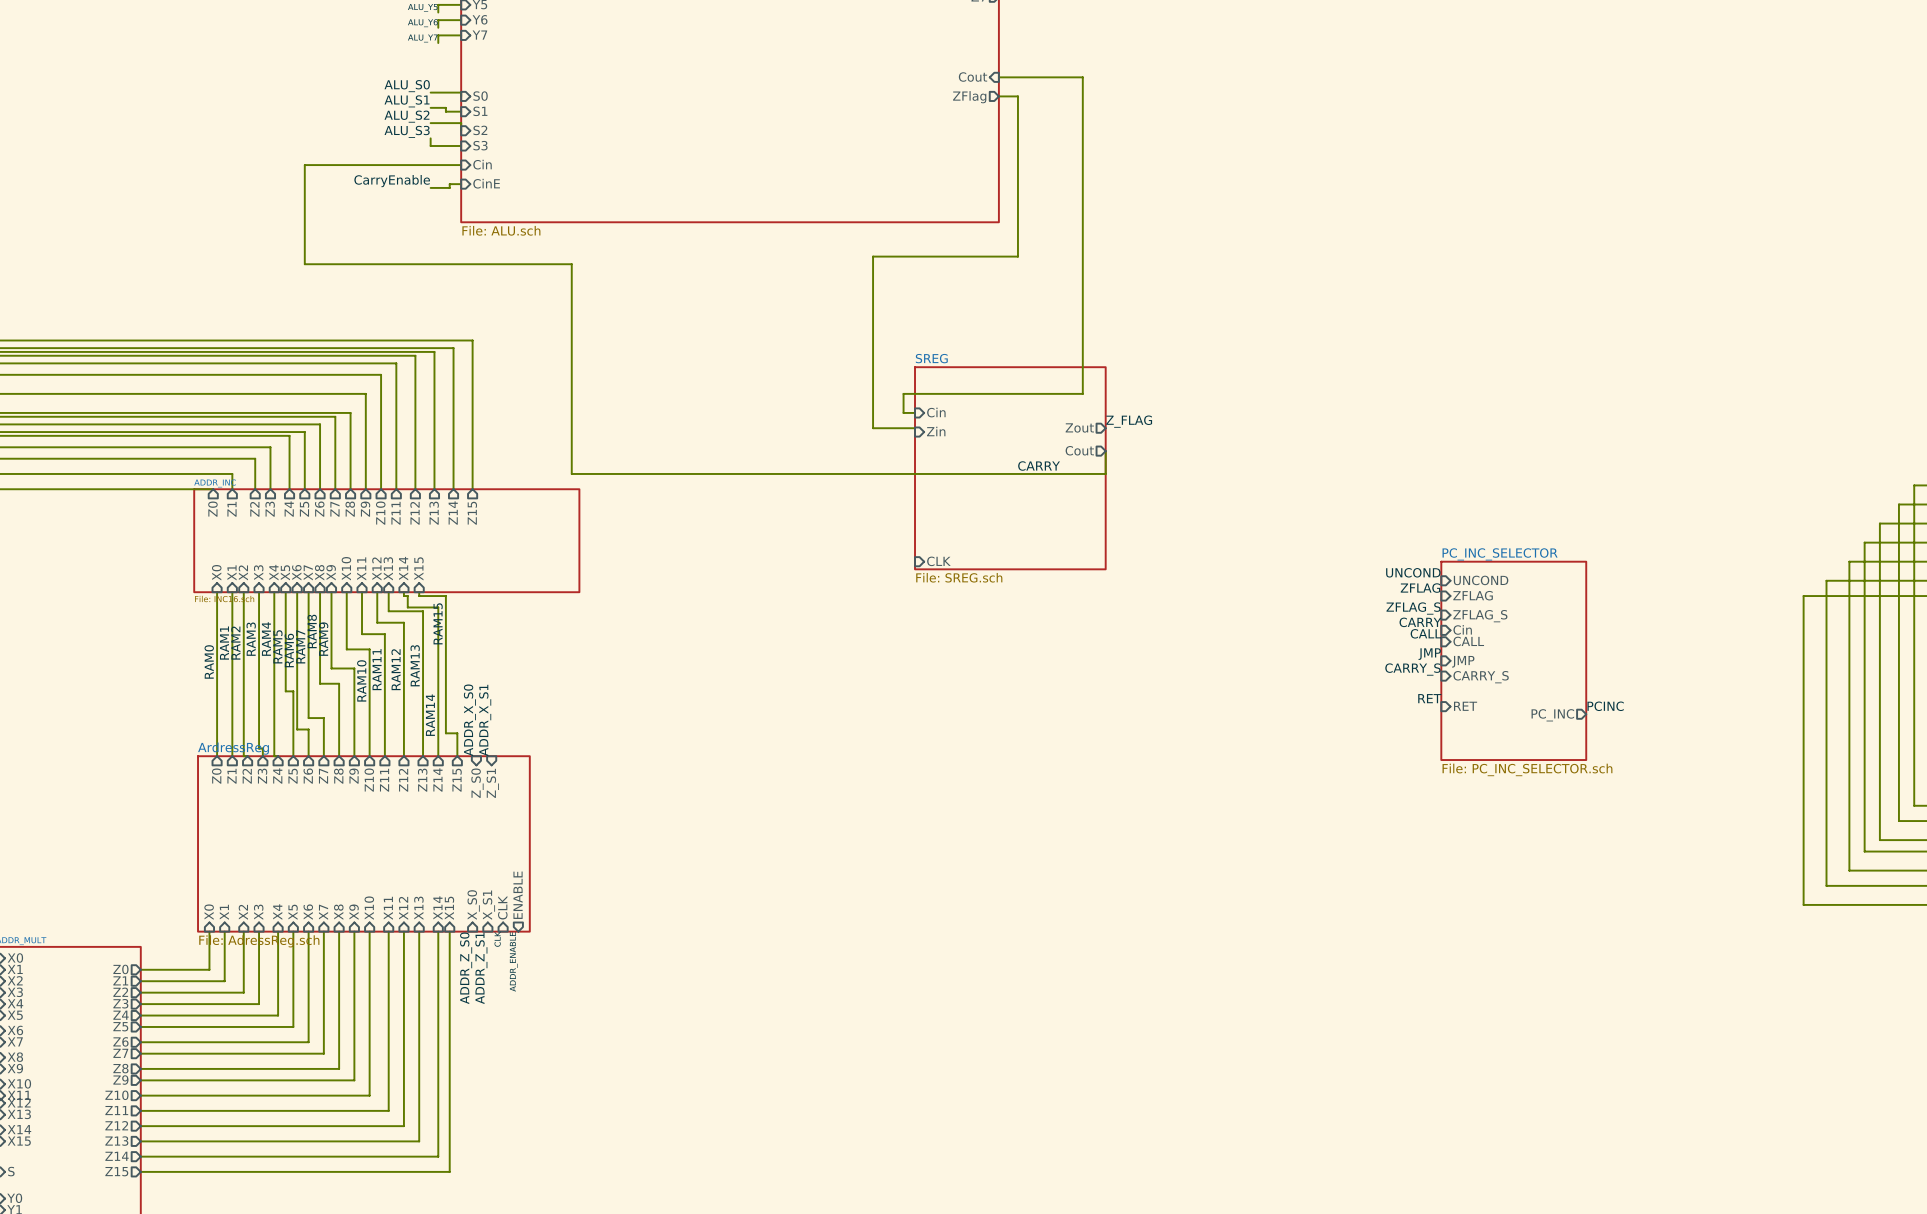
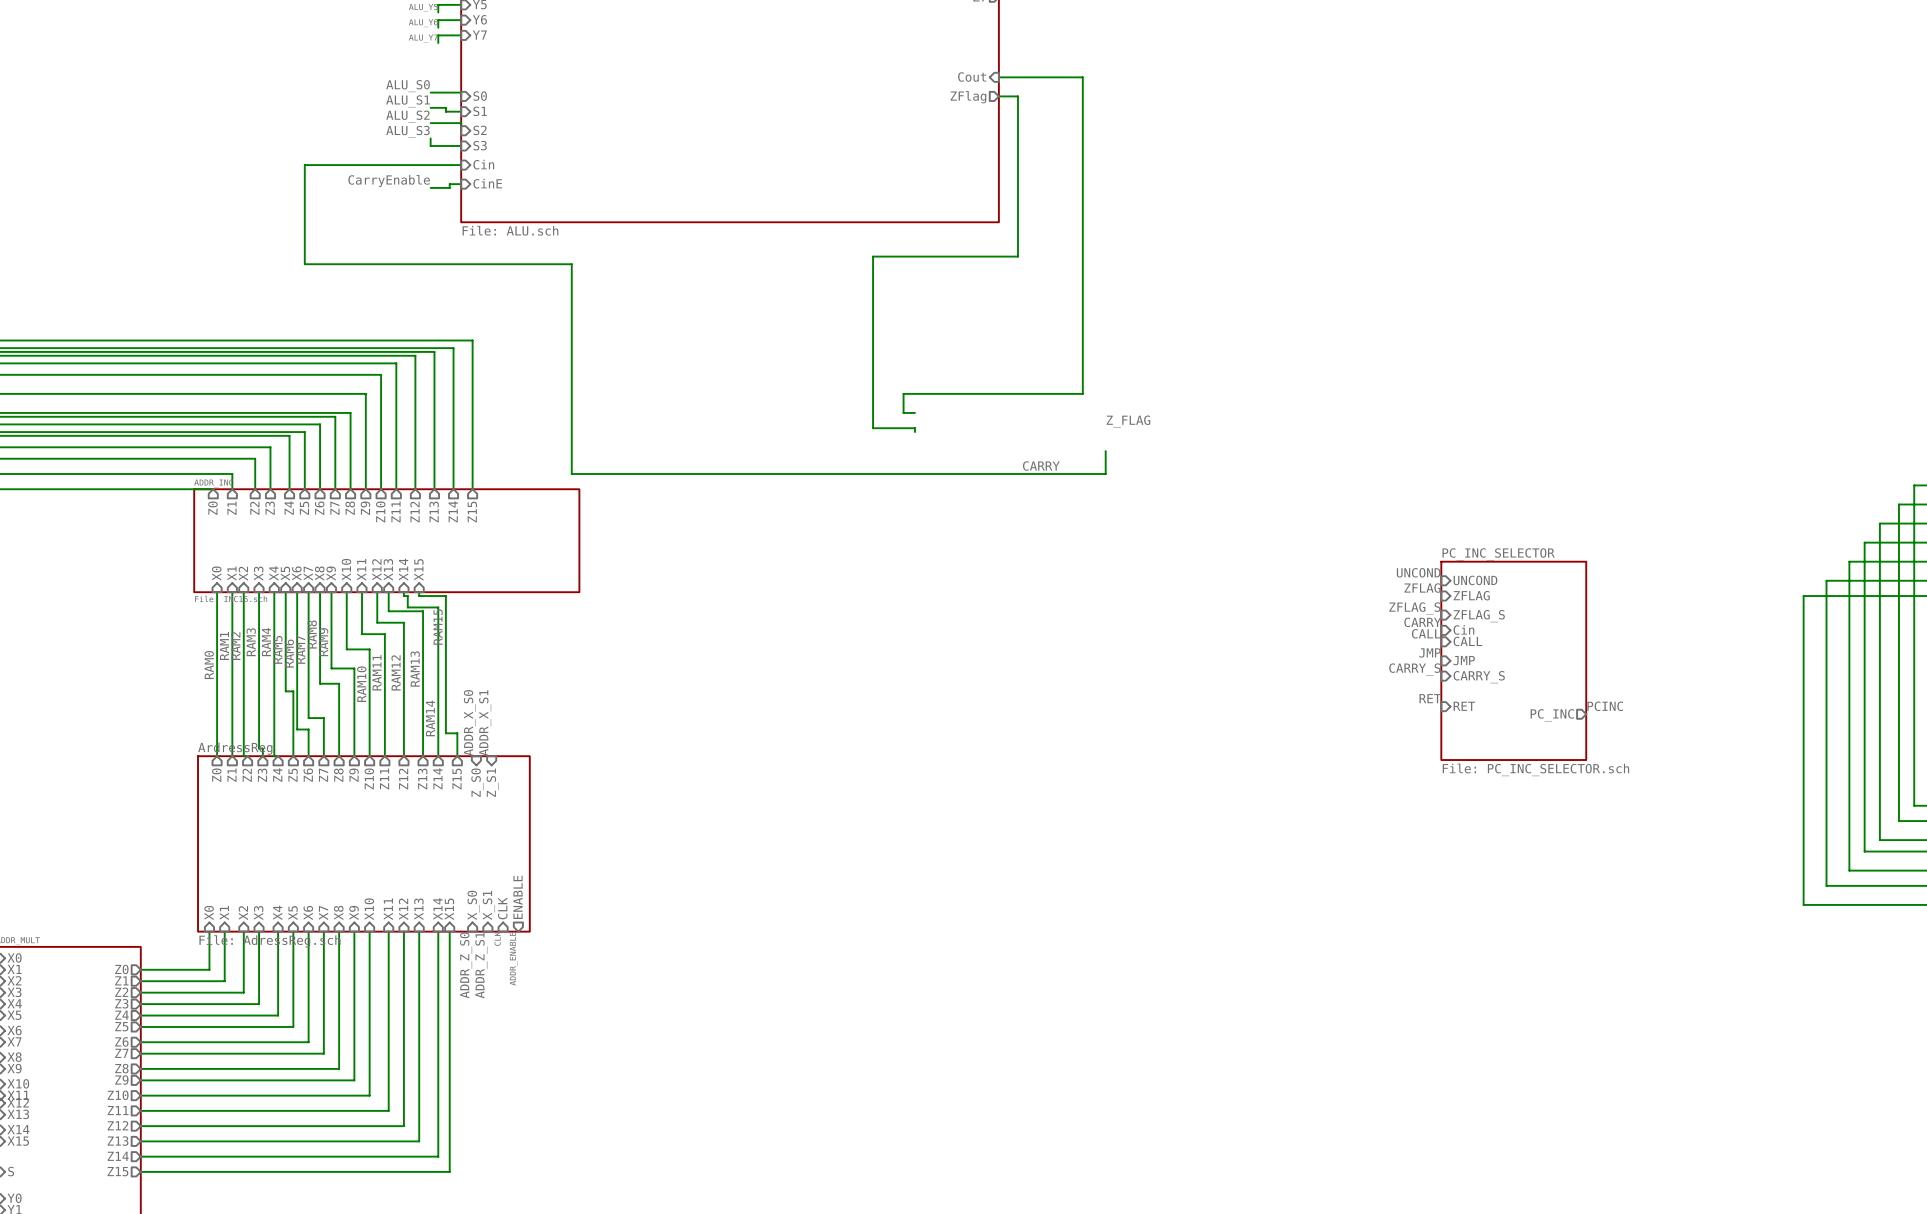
sheet pin: Cin (936, 412) -> none
sheet pin: Zout (1079, 427) -> none
sheet pin: Zin (936, 431) -> none
sheet pin: Cout (1079, 450) -> none
sheet SREG: File: SREG.sch (1010, 468) -> none
sheet pin: CLK (938, 561) -> none

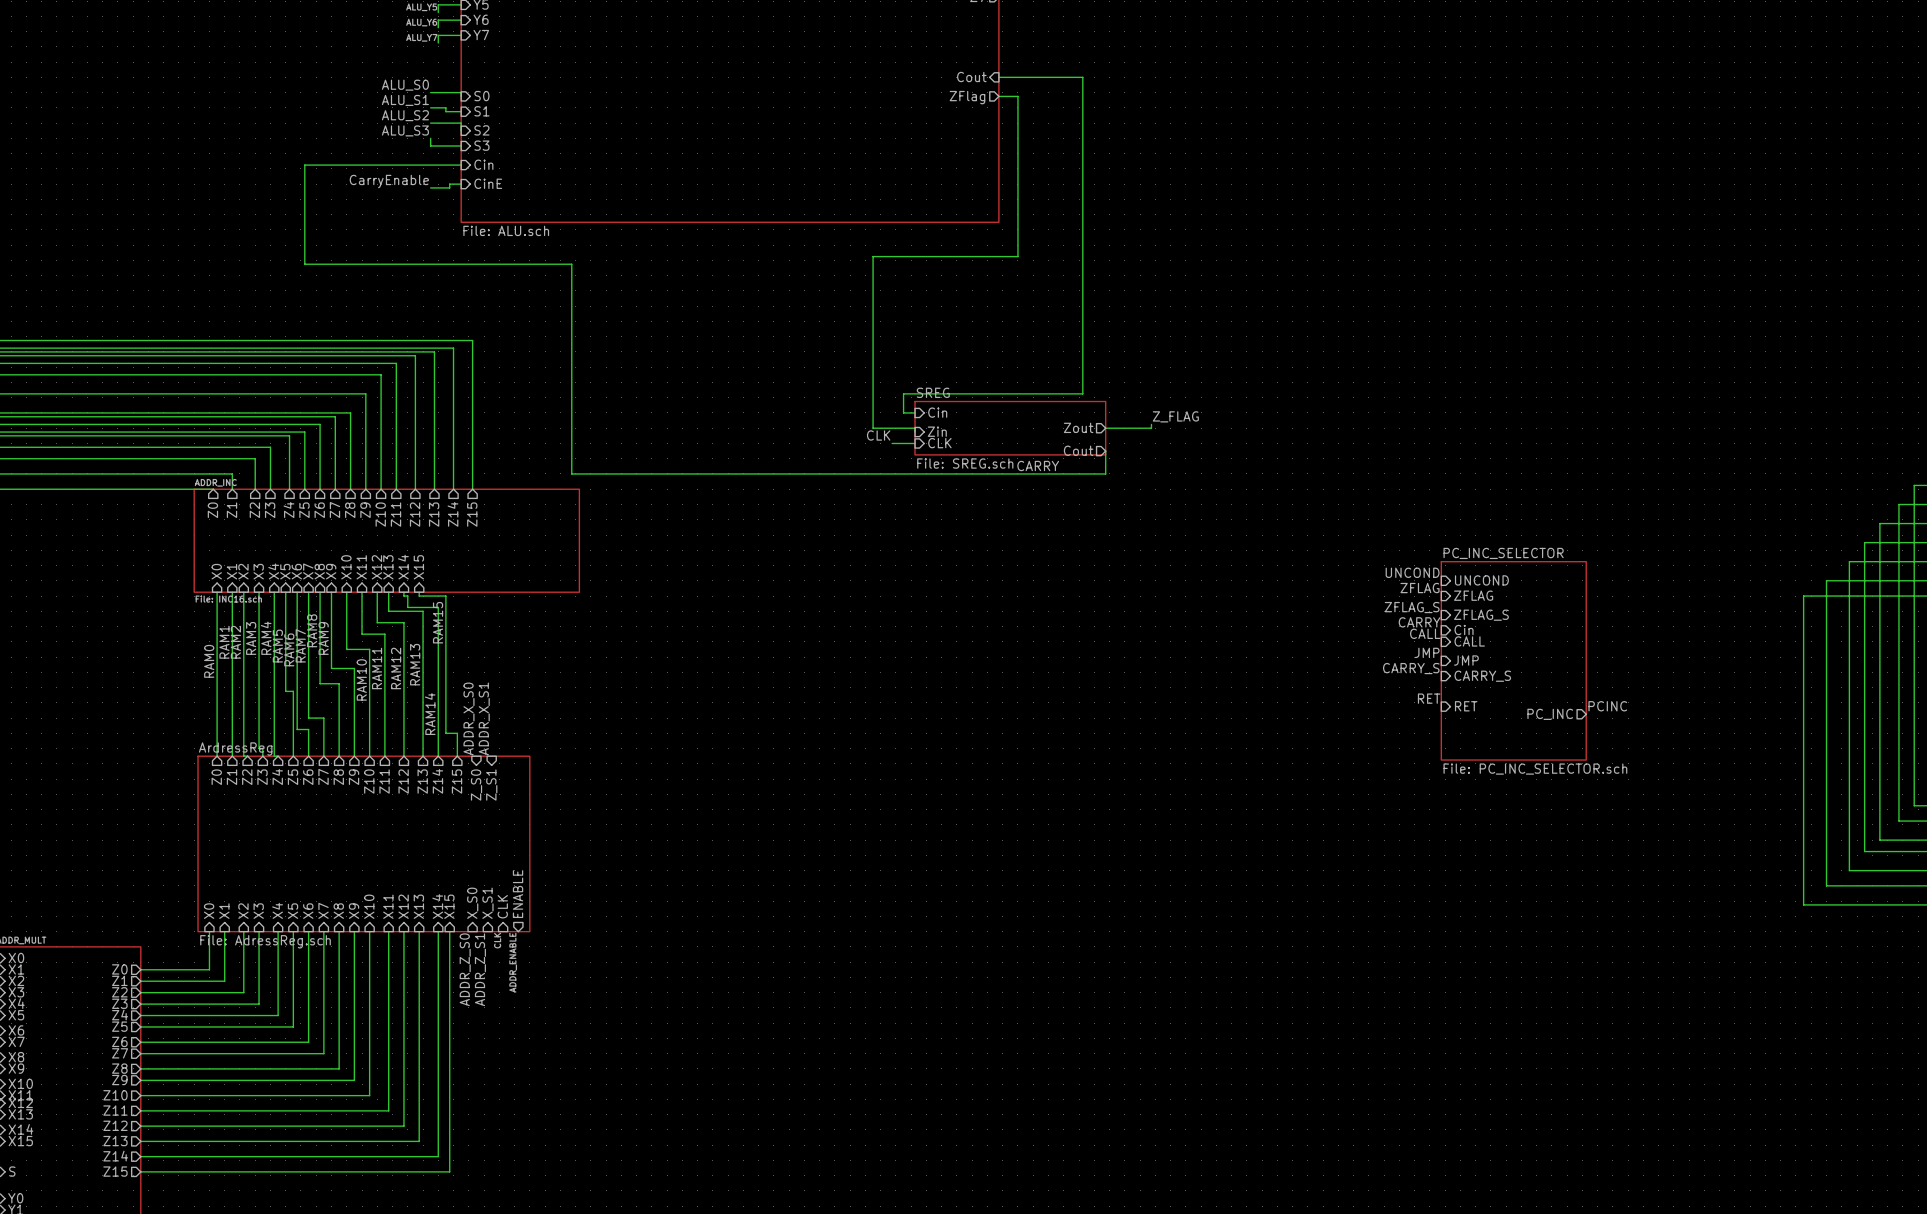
sheet pin: none -> Cin (937, 412)
label position: Z_FLAG (1128, 421) -> Z_FLAG (1175, 416)
wire: none -> (1151, 424) (1151, 428) (1105, 428)
sheet pin: none -> Zout (1078, 427)
sheet SREG: none -> File: SREG.sch (1010, 428)
sheet pin: none -> Zin (937, 431)
label: none -> CLK (878, 435)
wire: none -> (892, 443) (915, 443)
sheet pin: none -> CLK (939, 443)
sheet pin: none -> Cout (1078, 450)

